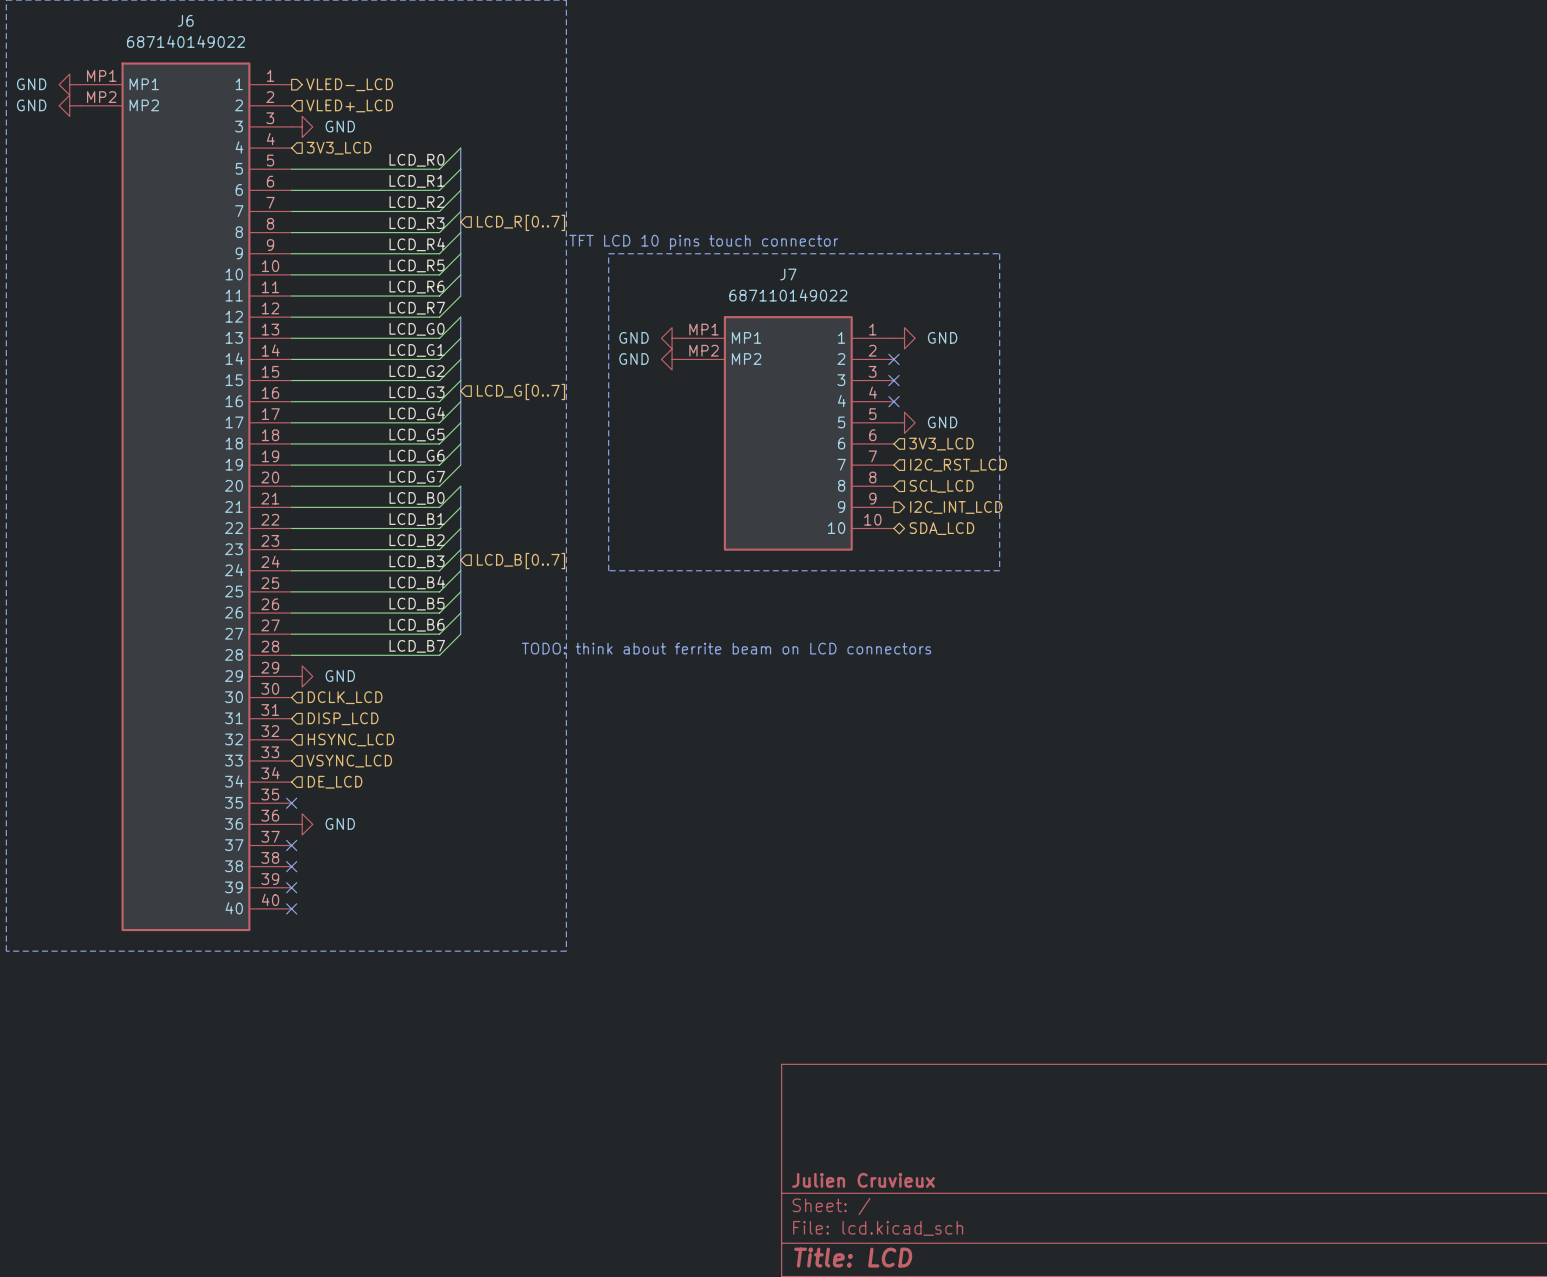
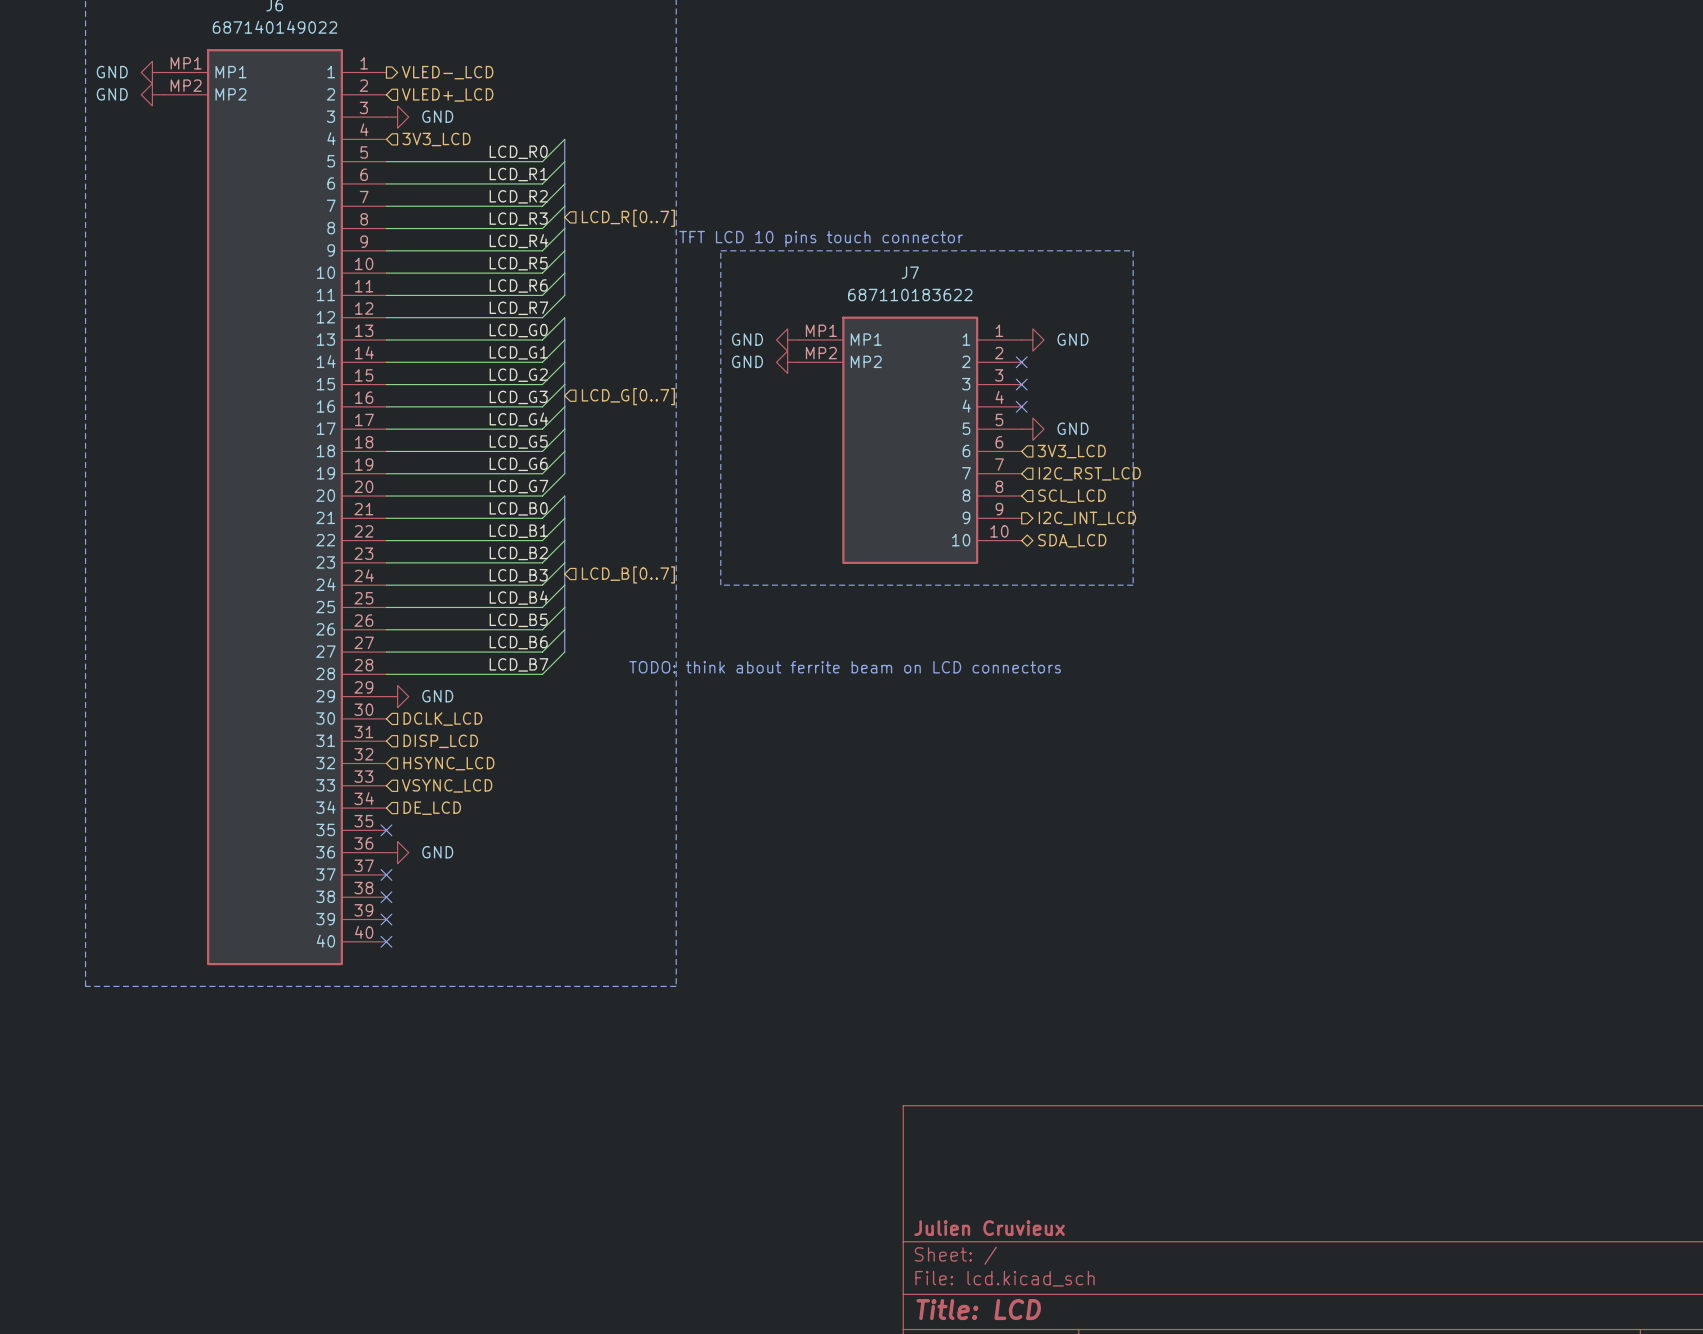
J7 value: 687110149022 (788, 295) -> 687110183622 (910, 294)

